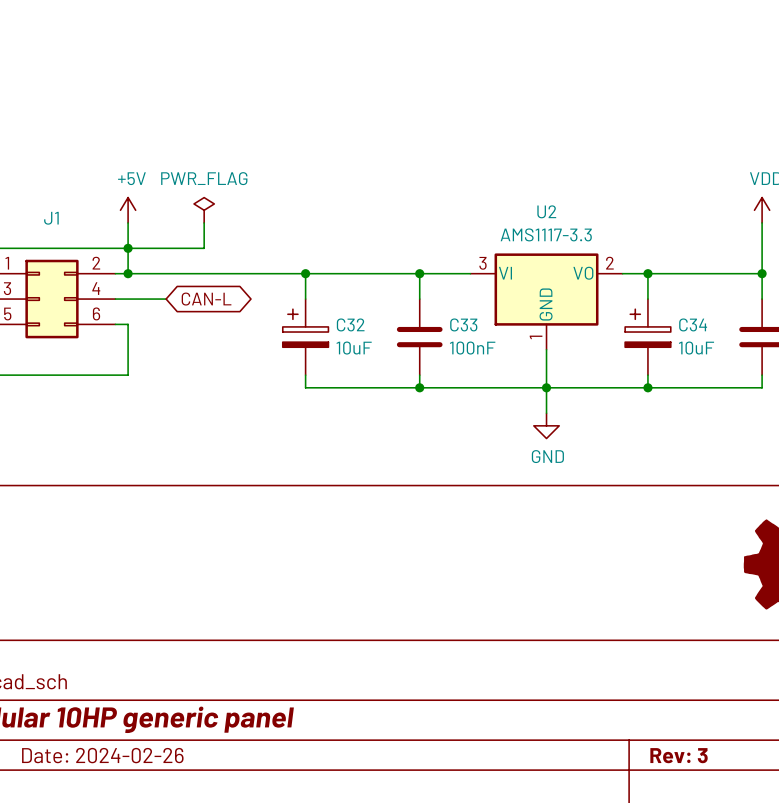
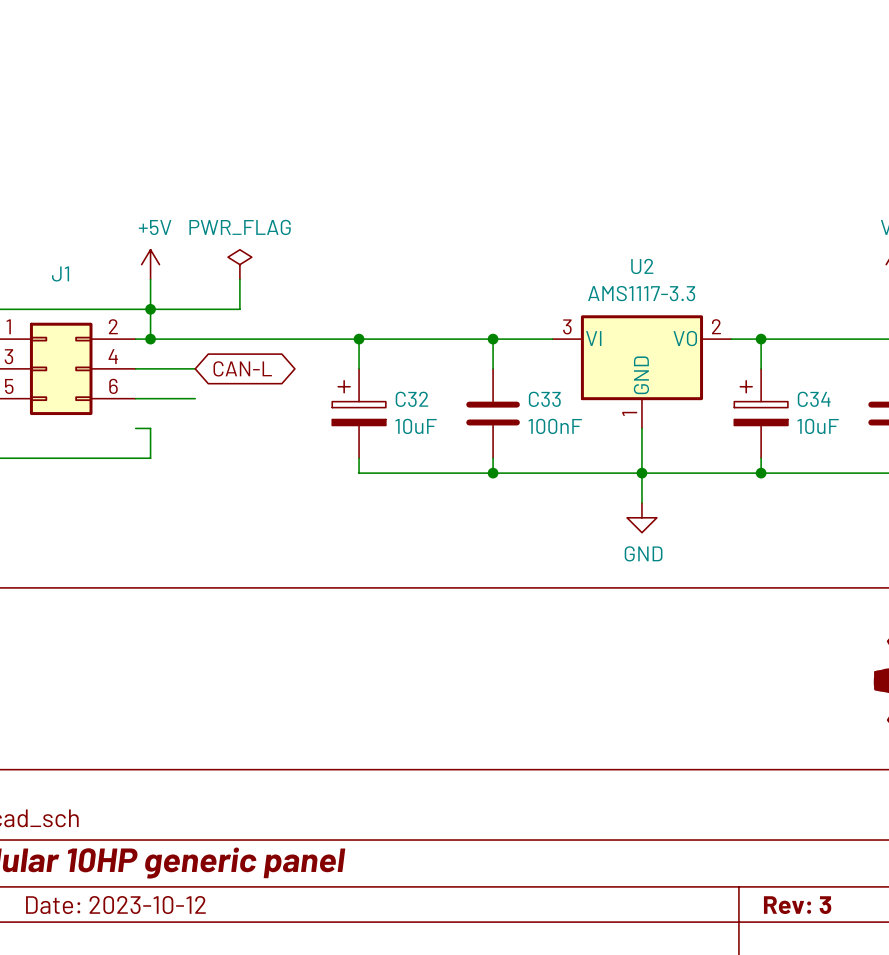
wire: (128, 324) (128, 349) -> (135, 428) (150, 428)
wire: none -> (150, 398) (195, 398)
title block: Date: 2024-02-26 (102, 755) -> Date: 2023-10-12 (115, 905)

